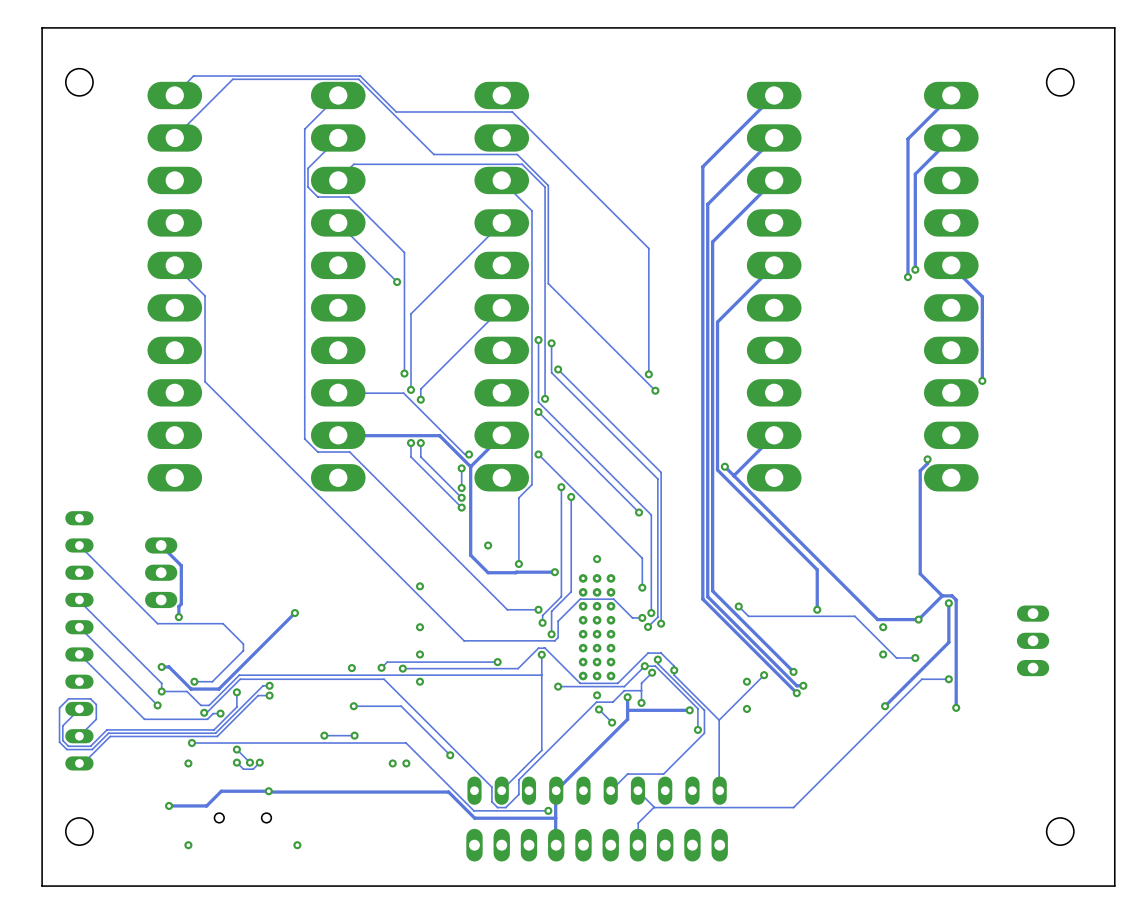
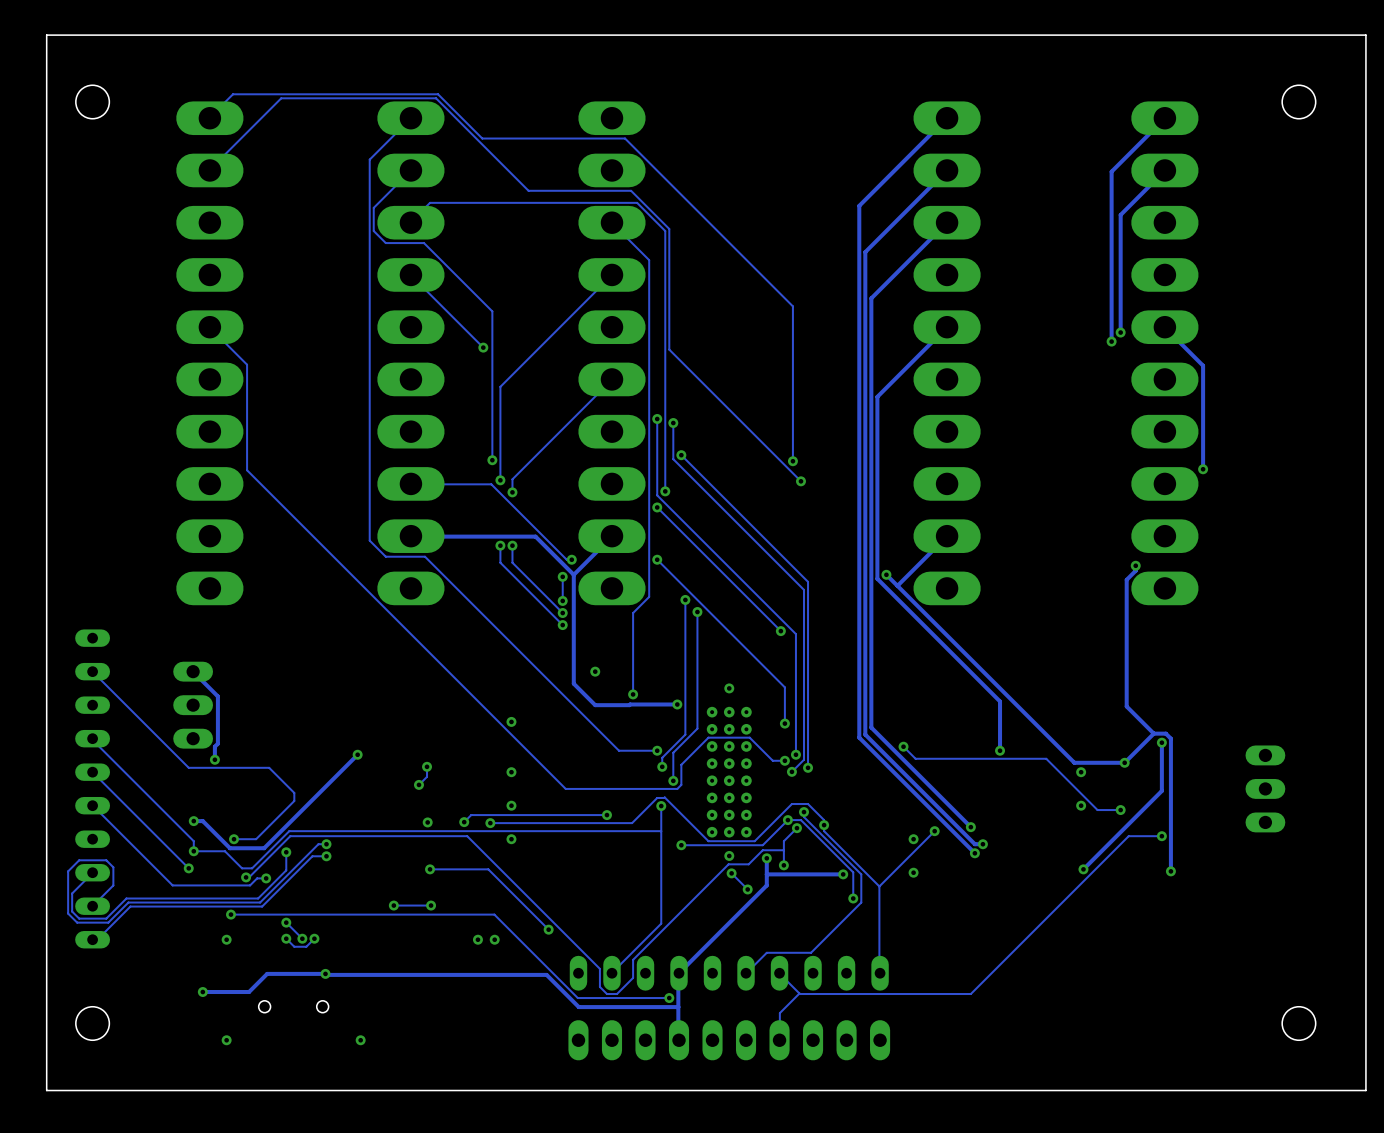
track: none -> (427, 766) (427, 776) (418, 784)
via: none -> (427, 766)
via: none -> (418, 784)

